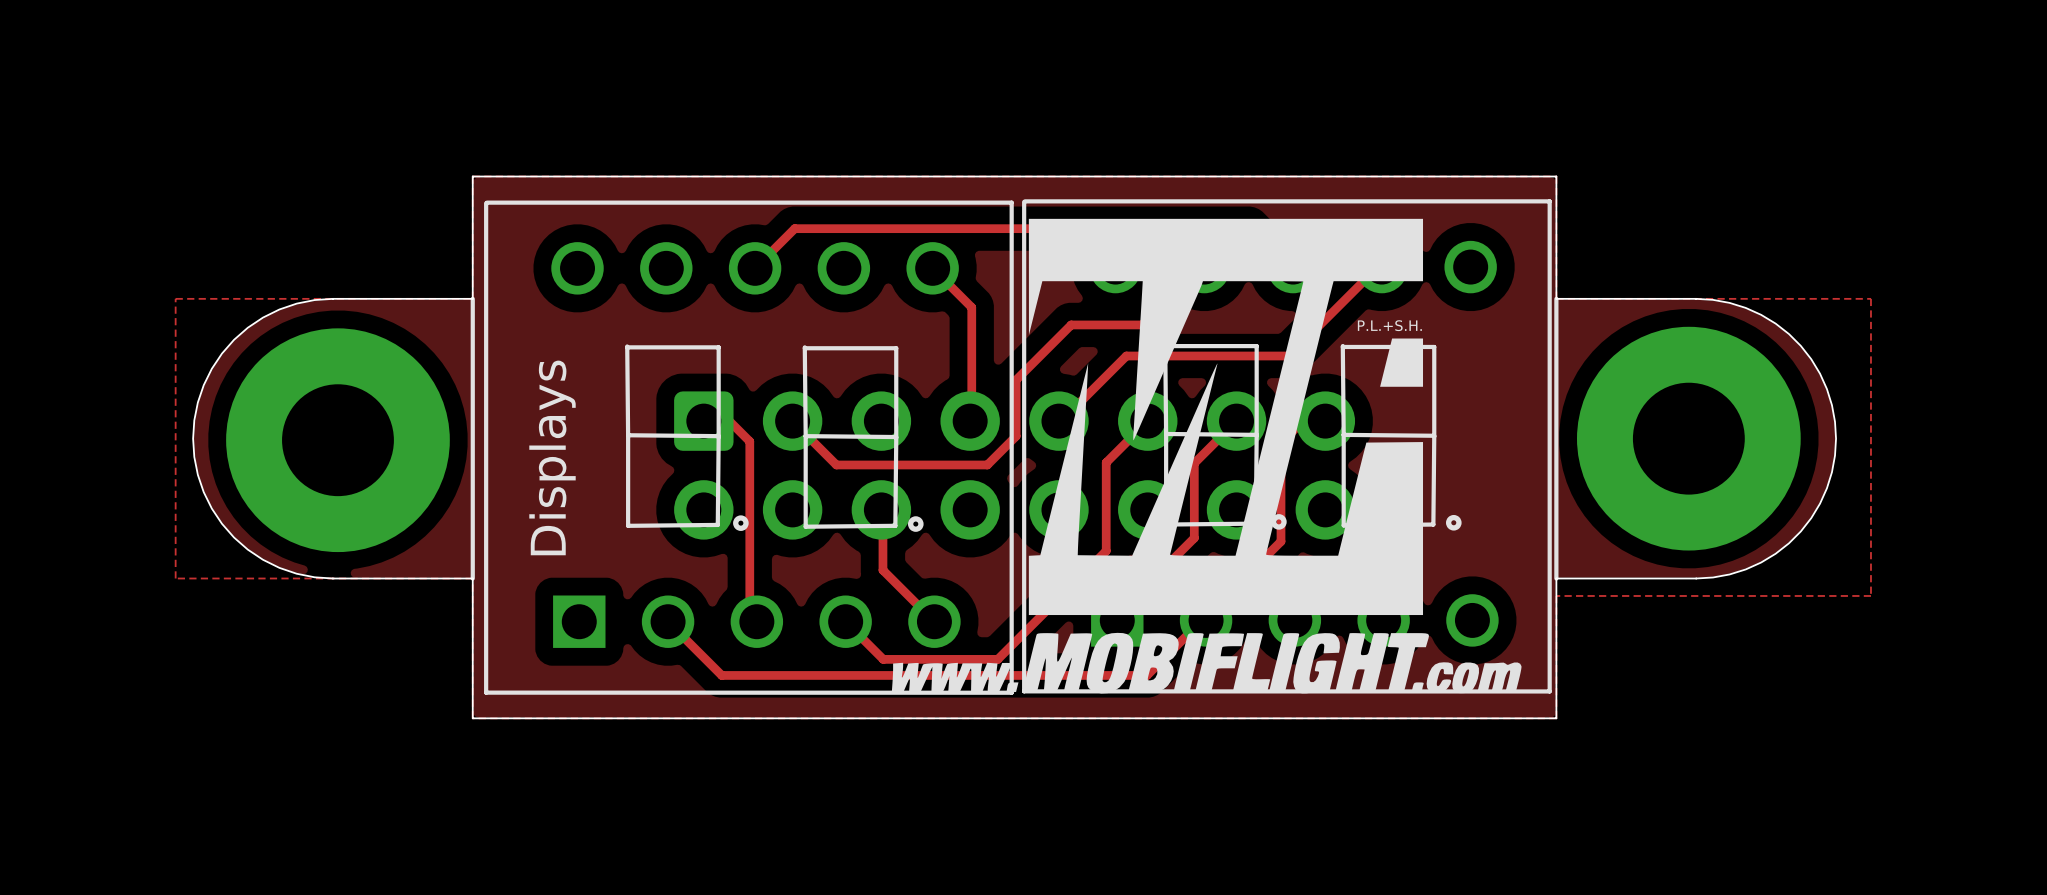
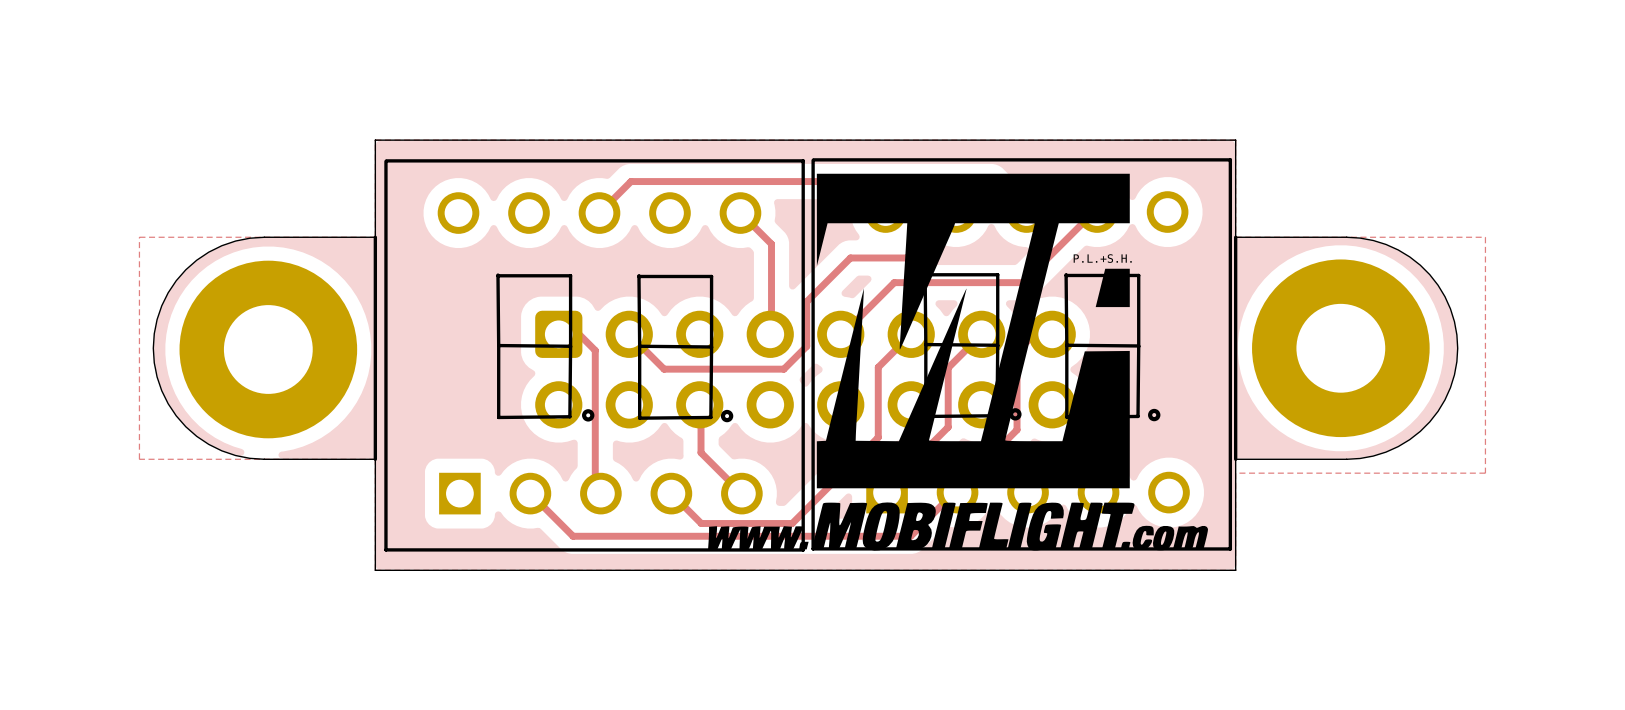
text: Displays (552, 457) -> none

